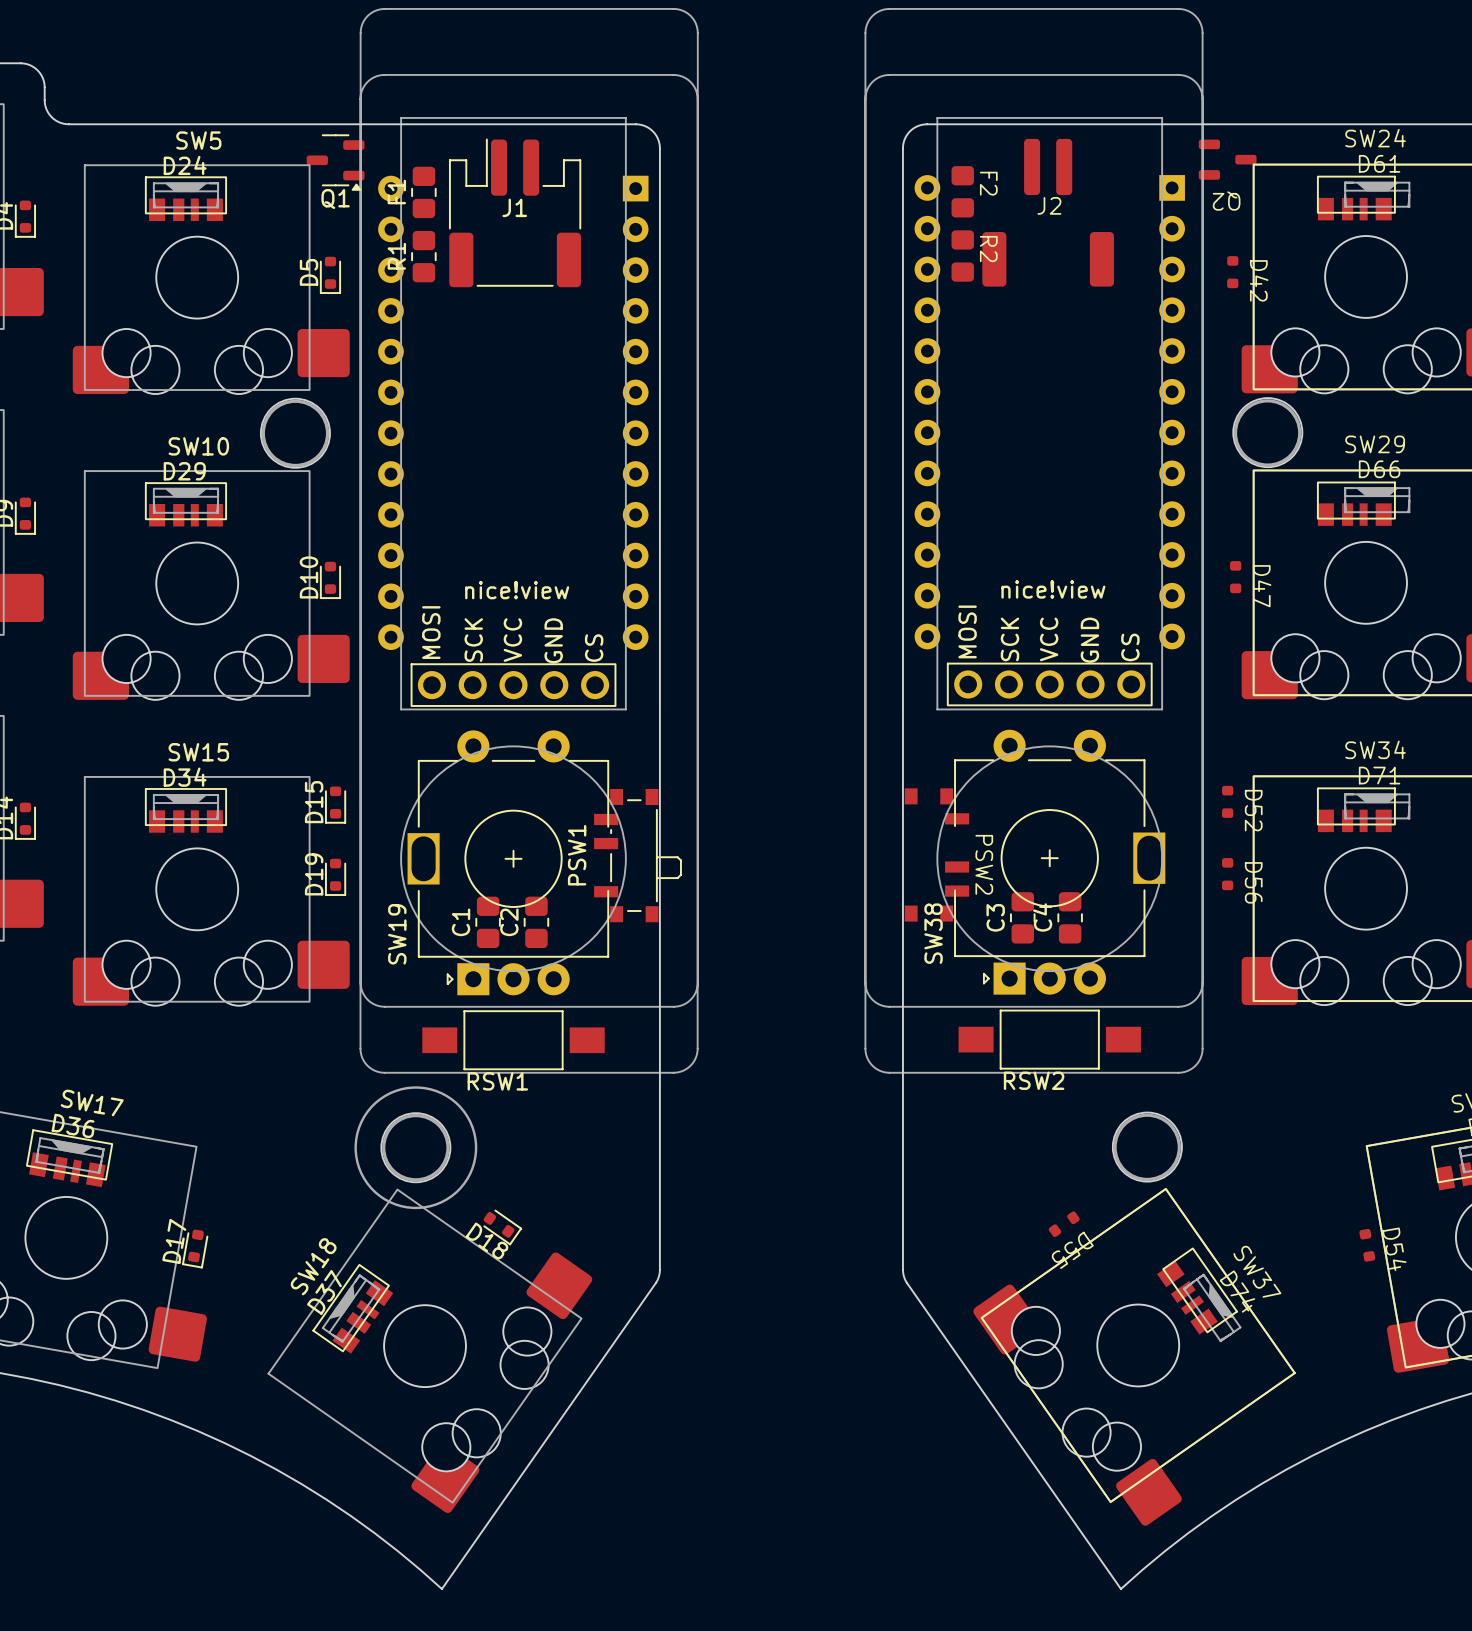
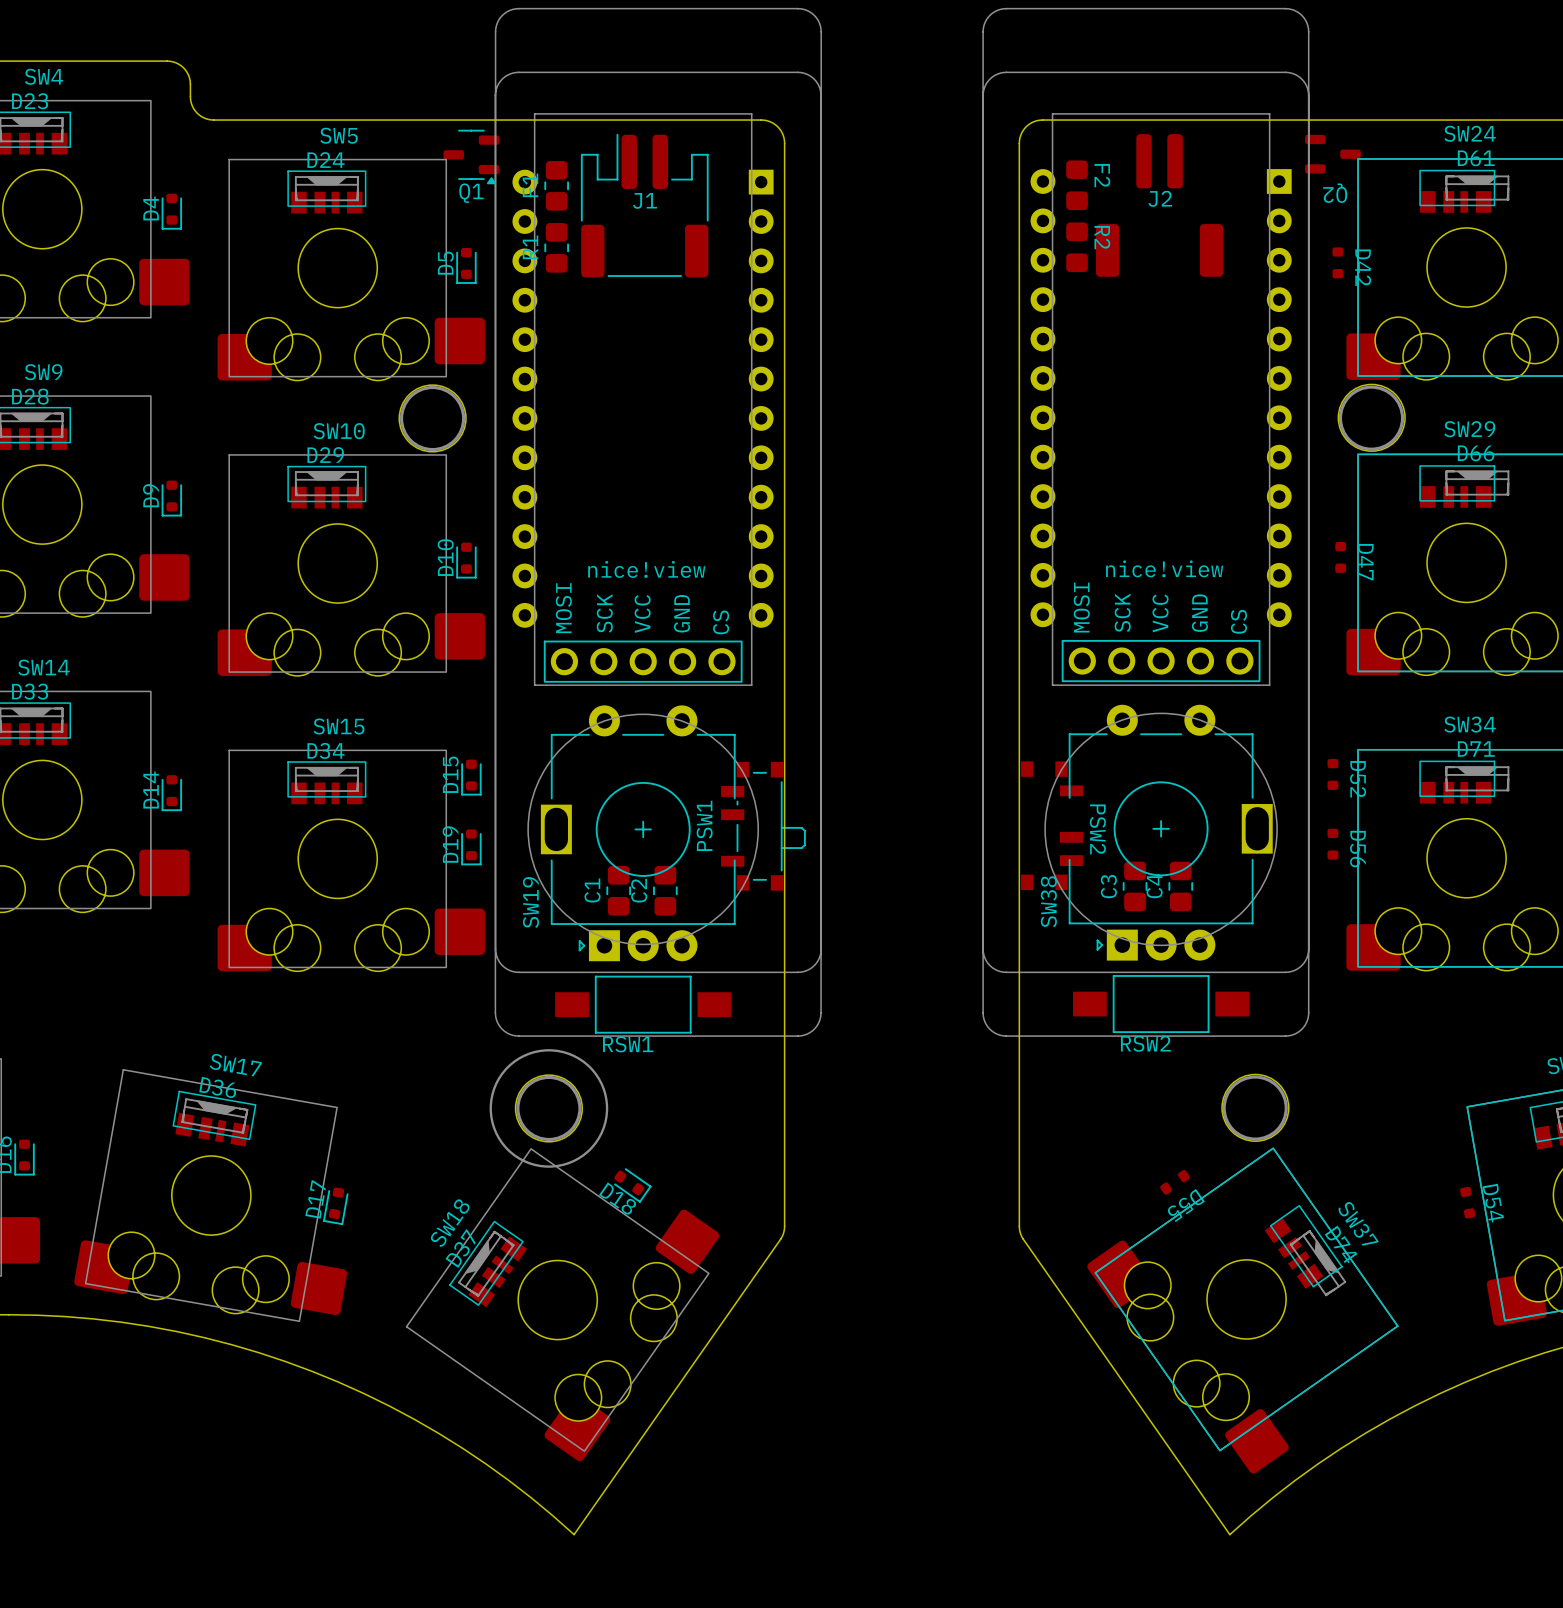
drawing shape: [400, 745, 627, 972] -> [527, 713, 760, 946]
drawing shape: [936, 745, 1163, 972] -> [1044, 712, 1278, 947]

